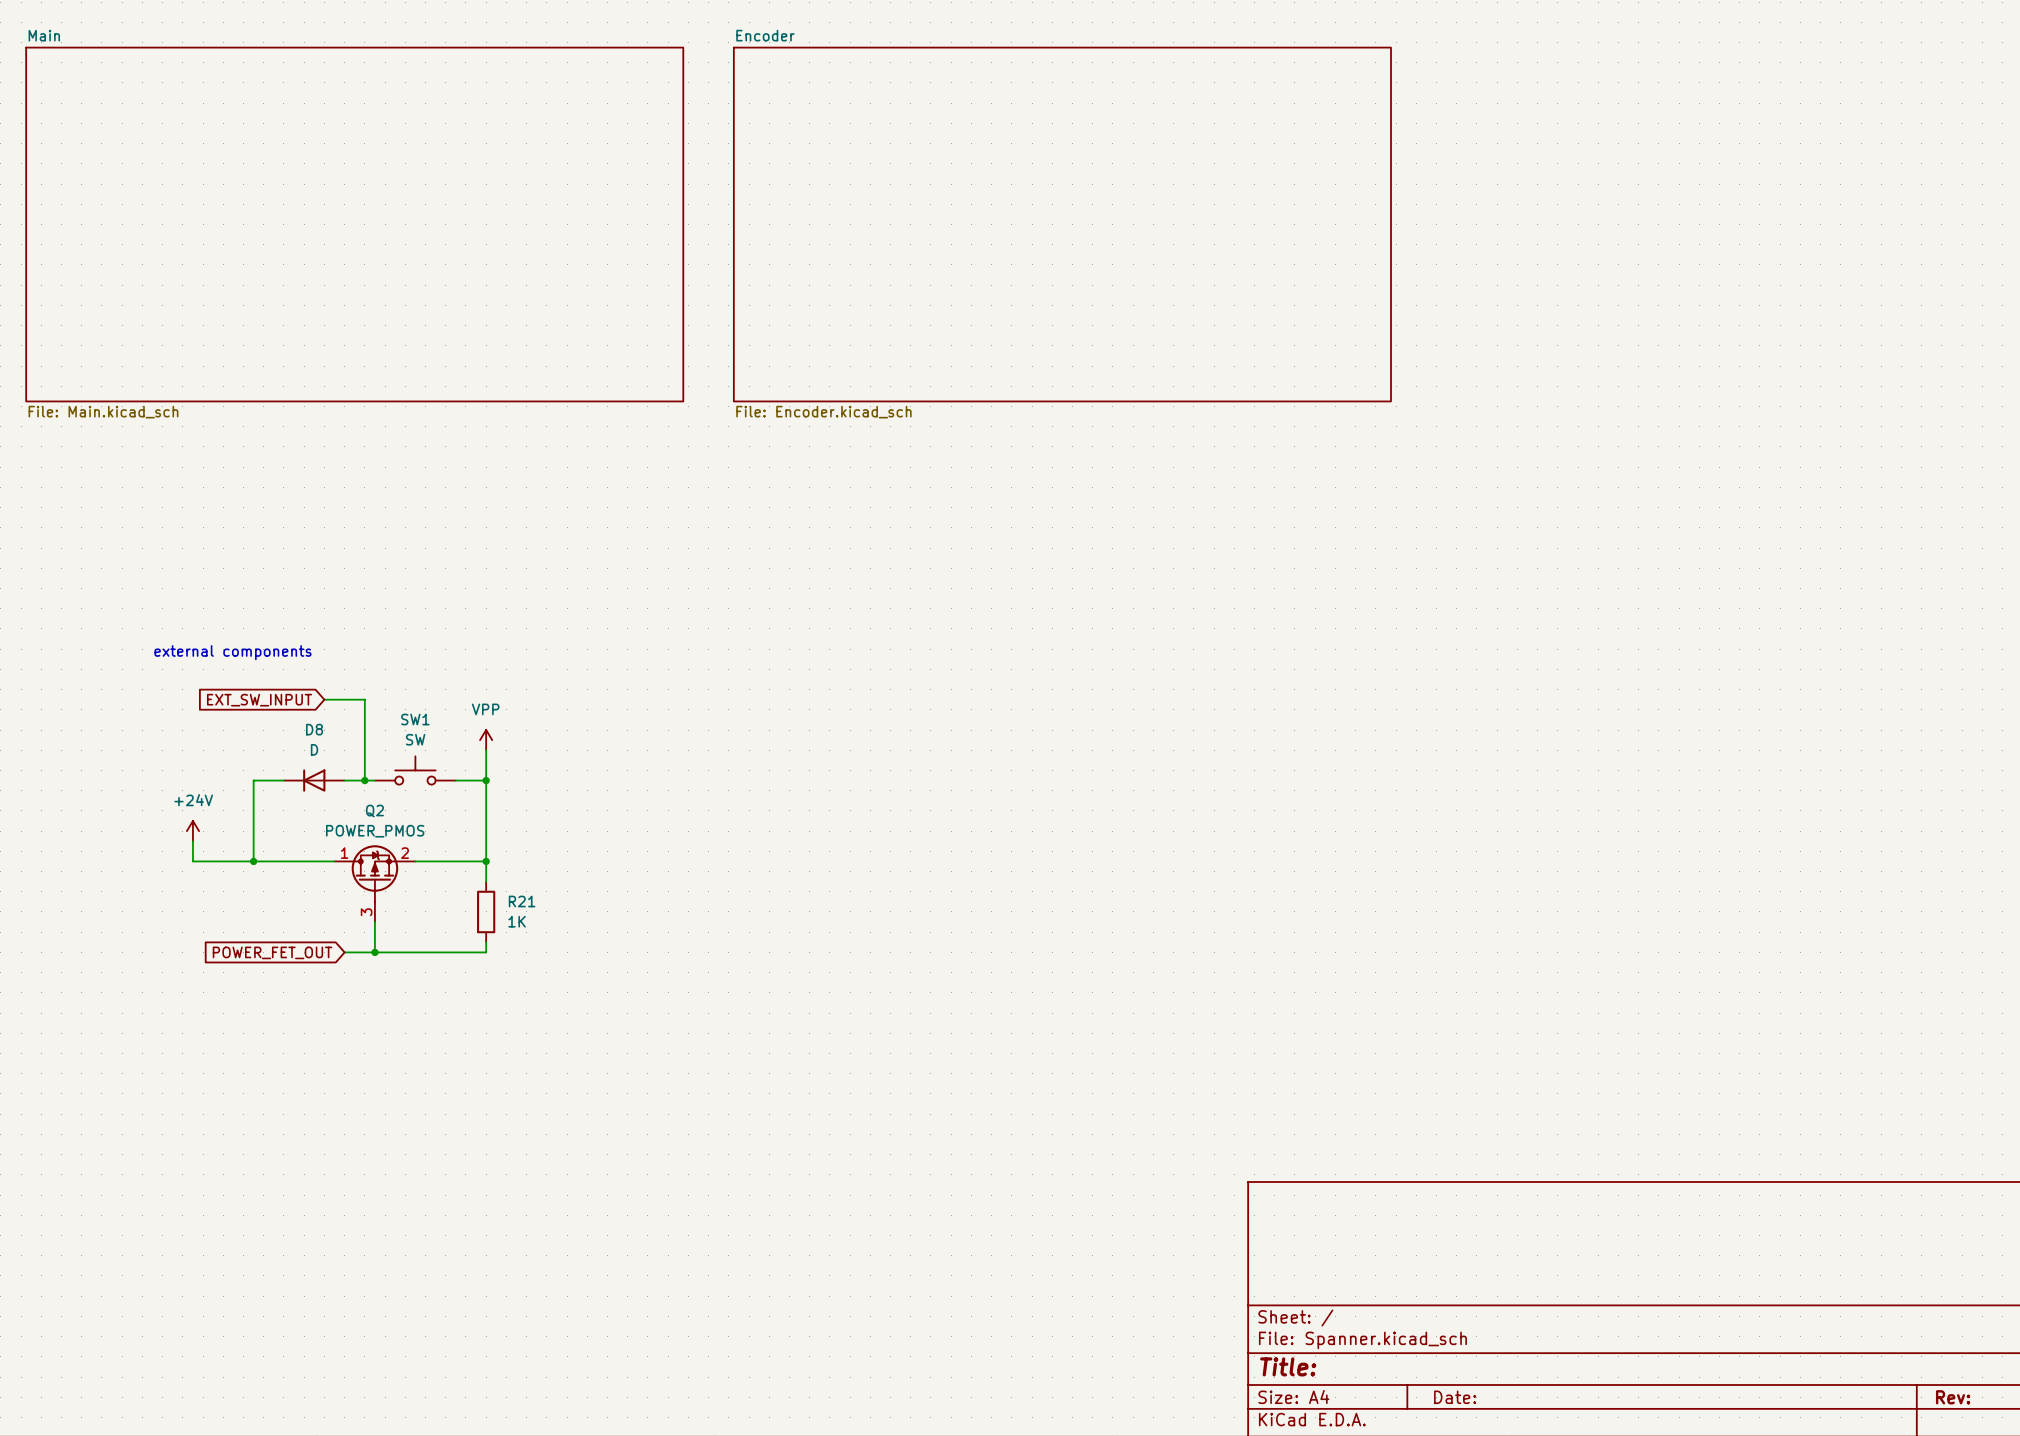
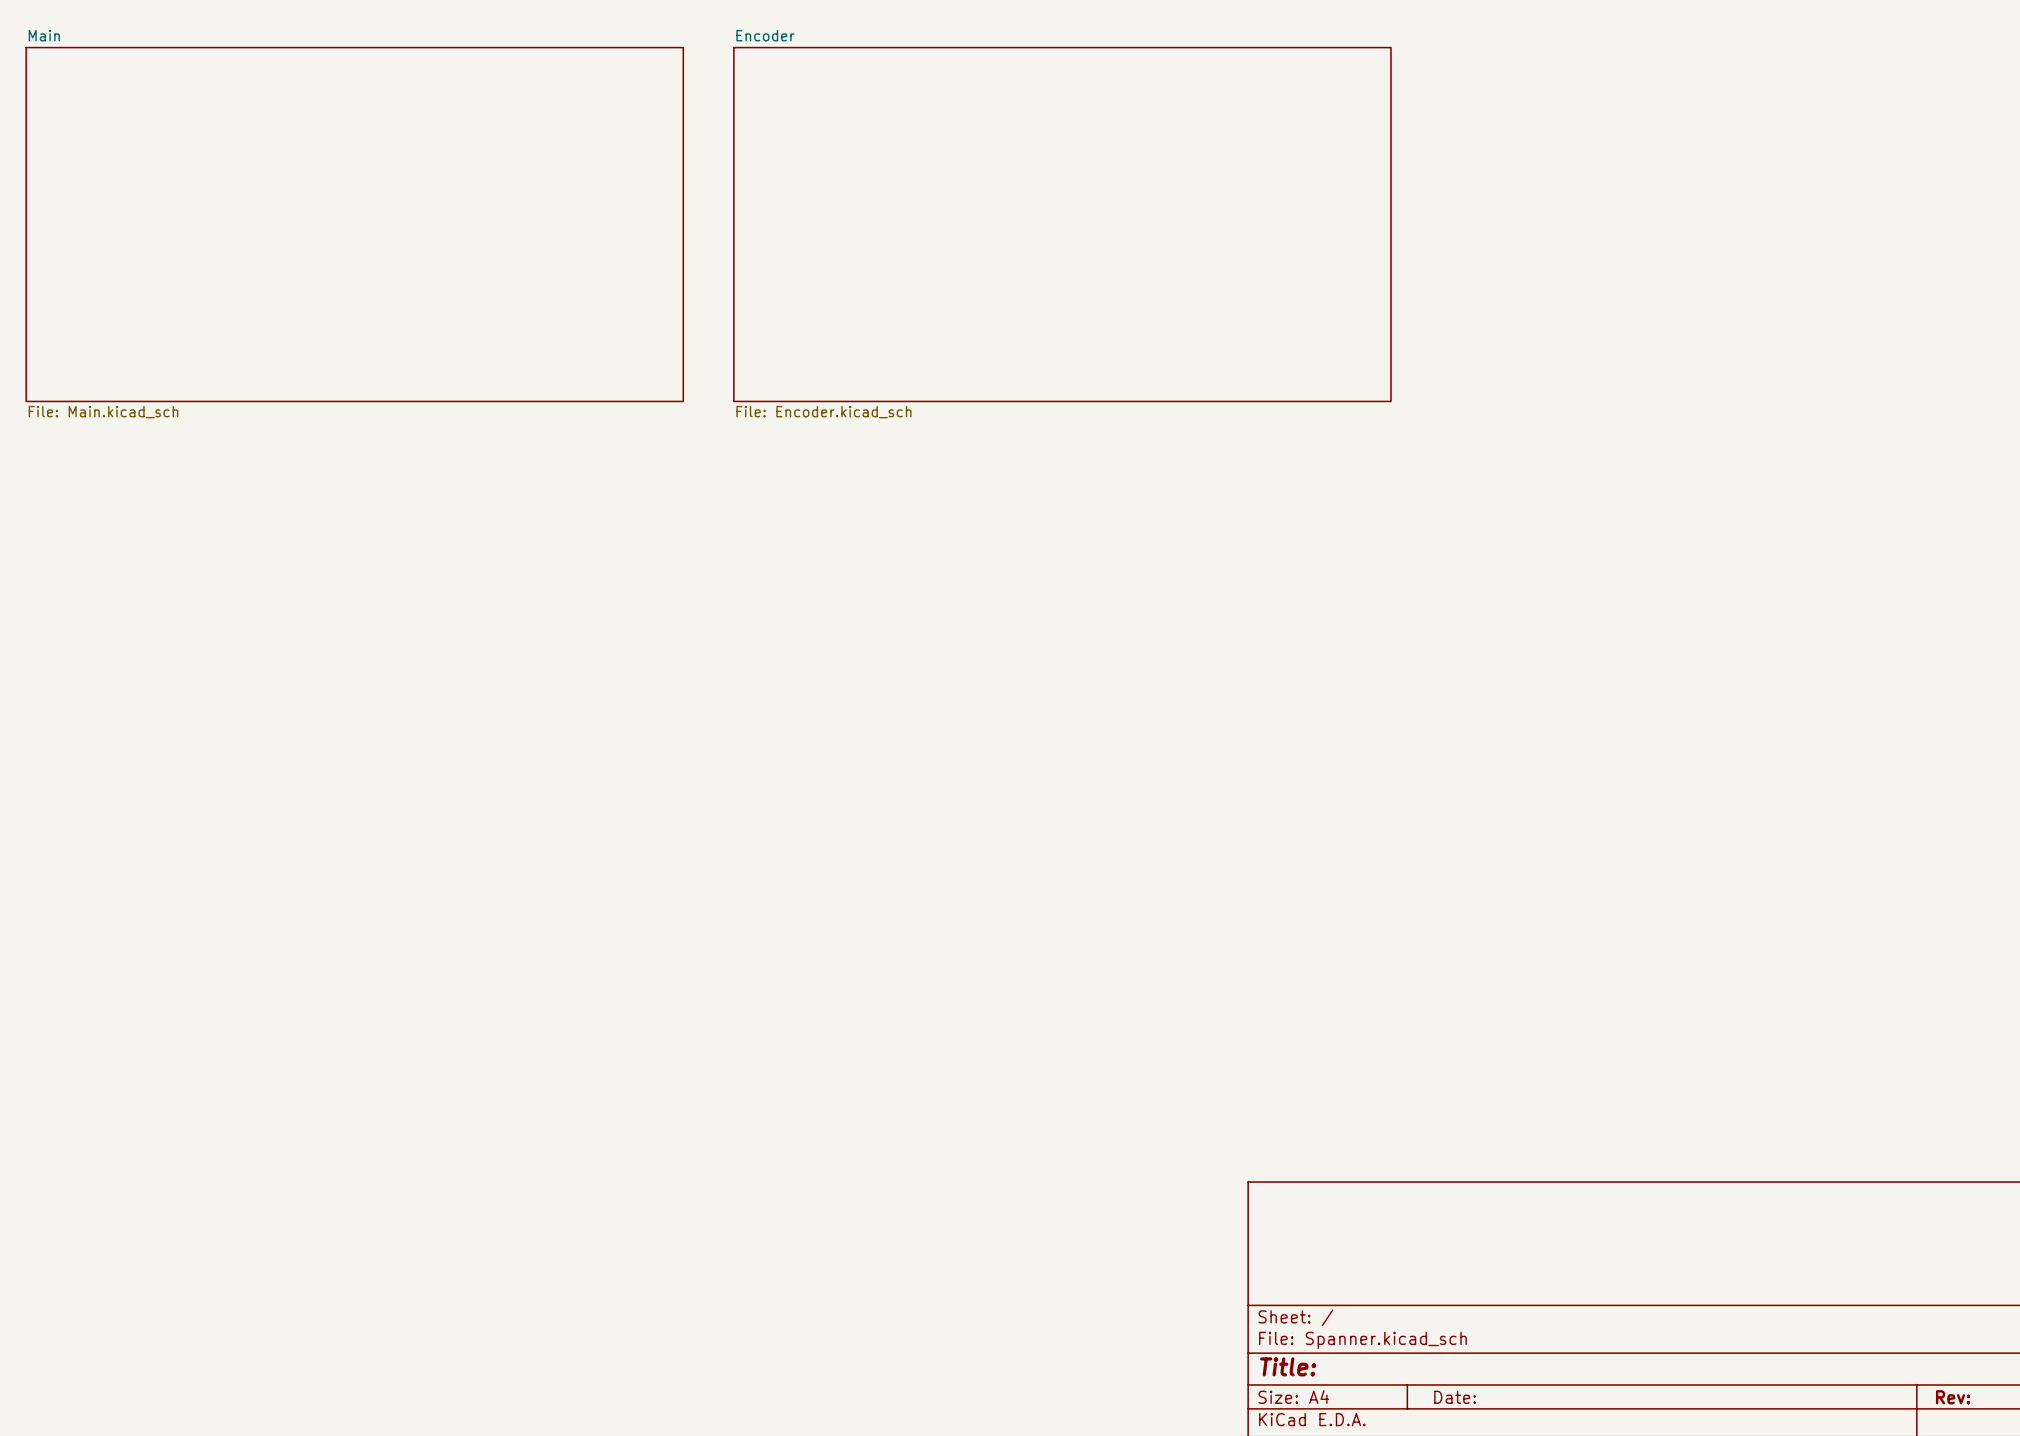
text: external components (233, 652) -> none
wire: (324, 699) (364, 699) (364, 780) -> none
global label: EXT_SW_INPUT (259, 700) -> none
power symbol: VPP (486, 740) -> none
wire: (486, 750) (486, 881) -> none
SW1: SW (415, 770) -> none
wire: (283, 780) (253, 780) (253, 861) -> none
D8: D (314, 780) -> none
wire: (344, 780) (374, 780) -> none
junction: (364, 780) -> none
wire: (455, 780) (486, 780) -> none
junction: (486, 780) -> none
power symbol: +24V (192, 831) -> none
wire: (192, 841) (192, 861) (334, 861) -> none
junction: (253, 861) -> none
wire: (415, 861) (486, 861) -> none
junction: (486, 861) -> none
Q2: POWER_PMOS (374, 883) -> none
R21: 1K (486, 911) -> none
wire: (374, 922) (374, 952) -> none
wire: (486, 942) (486, 952) (344, 952) -> none
global label: POWER_FET_OUT (272, 952) -> none
junction: (374, 952) -> none

